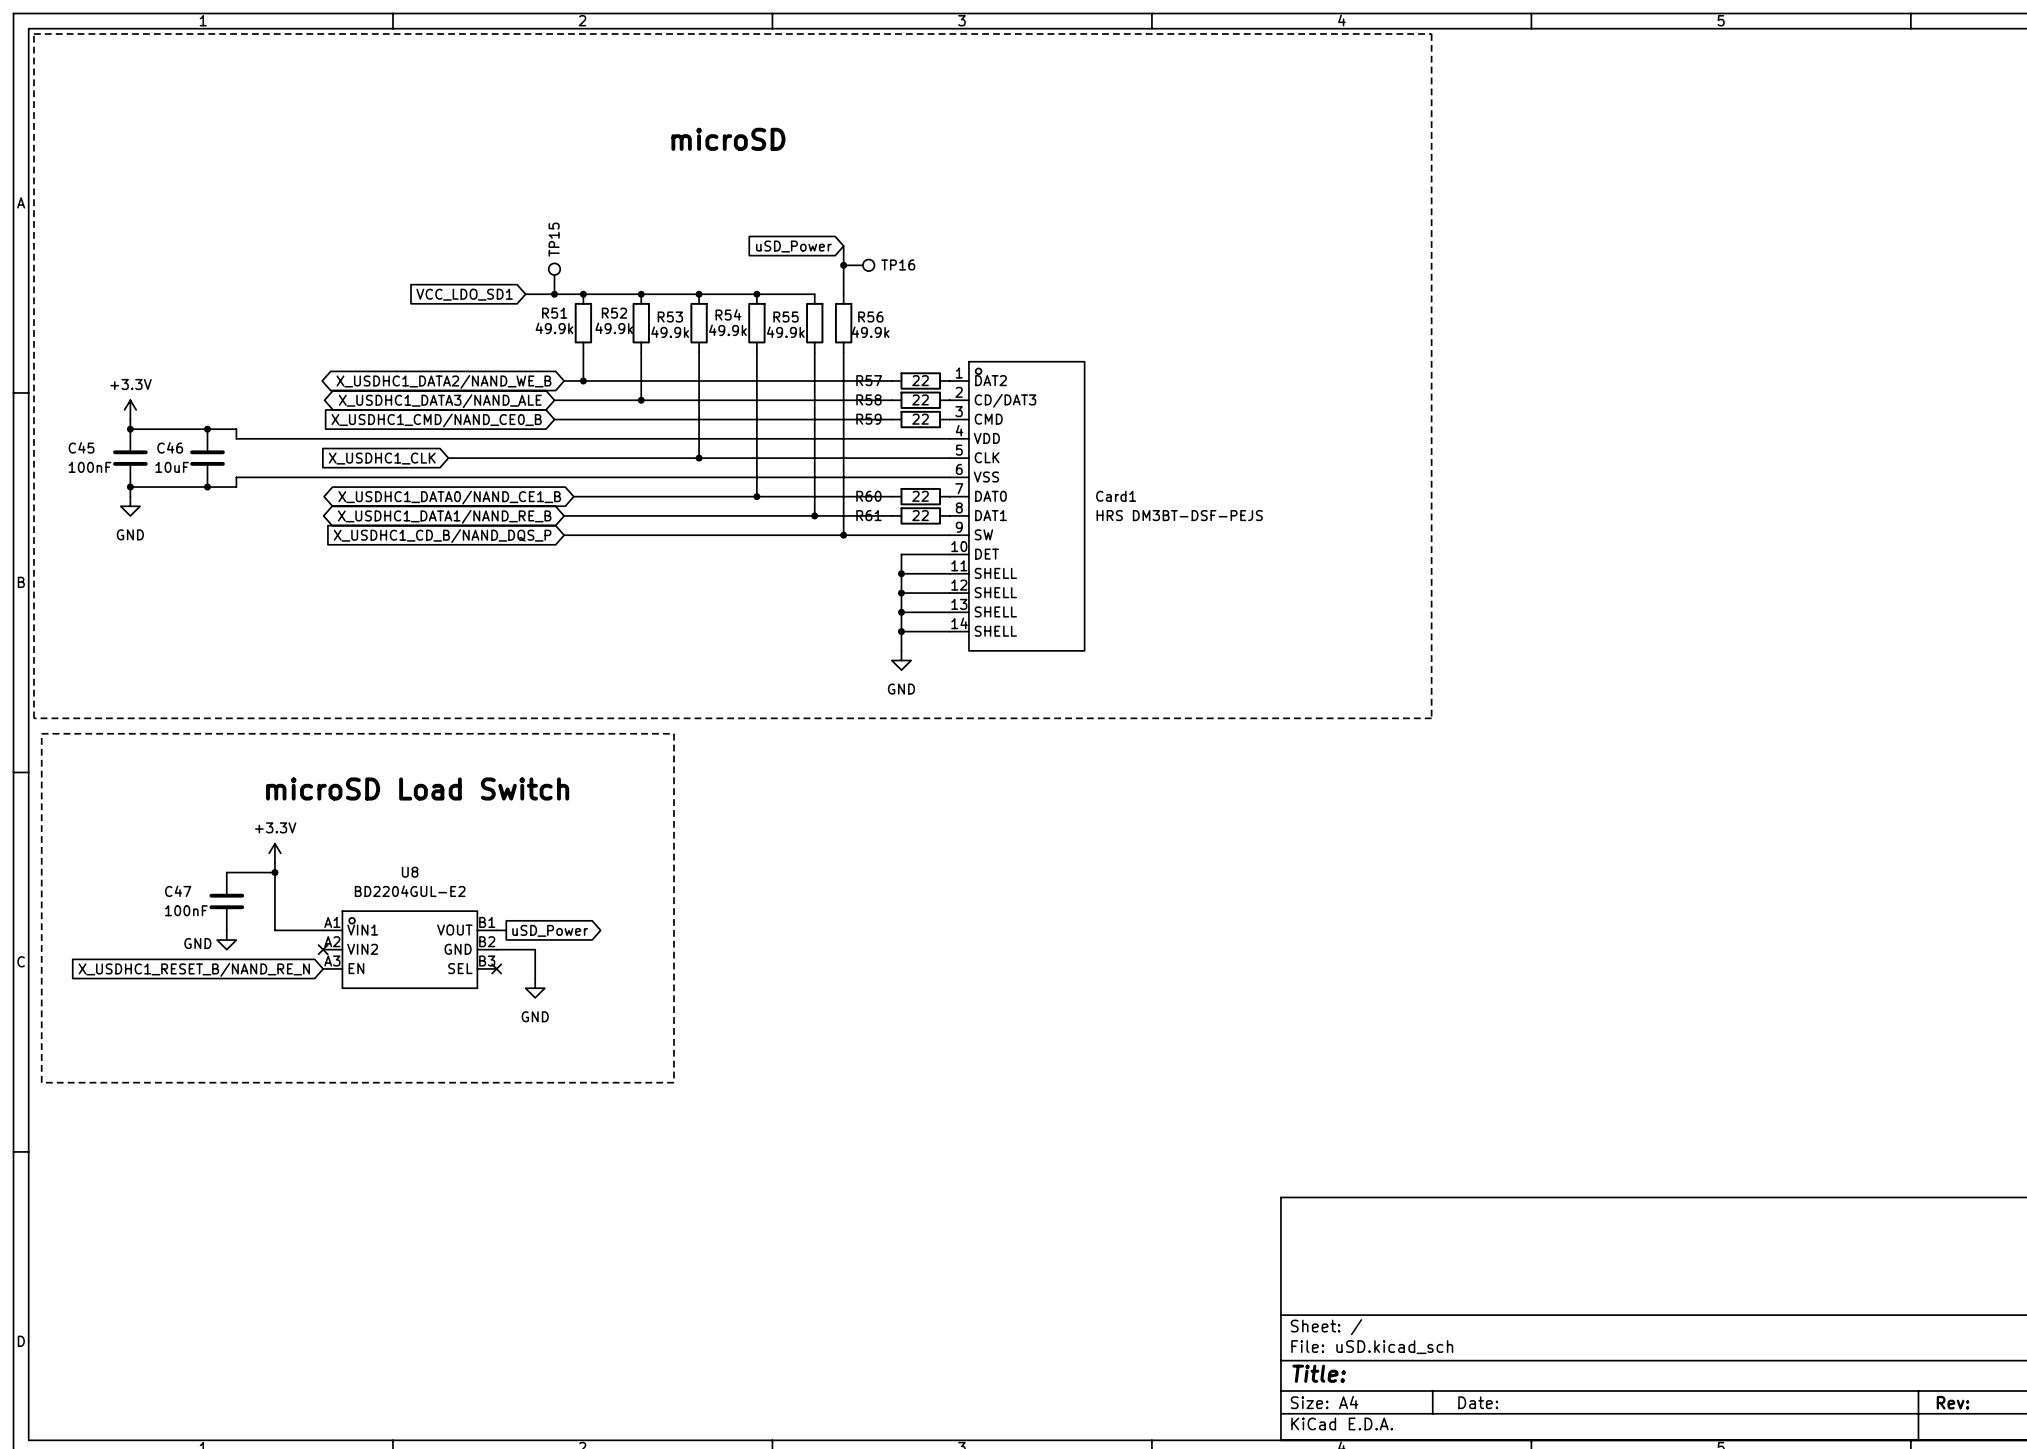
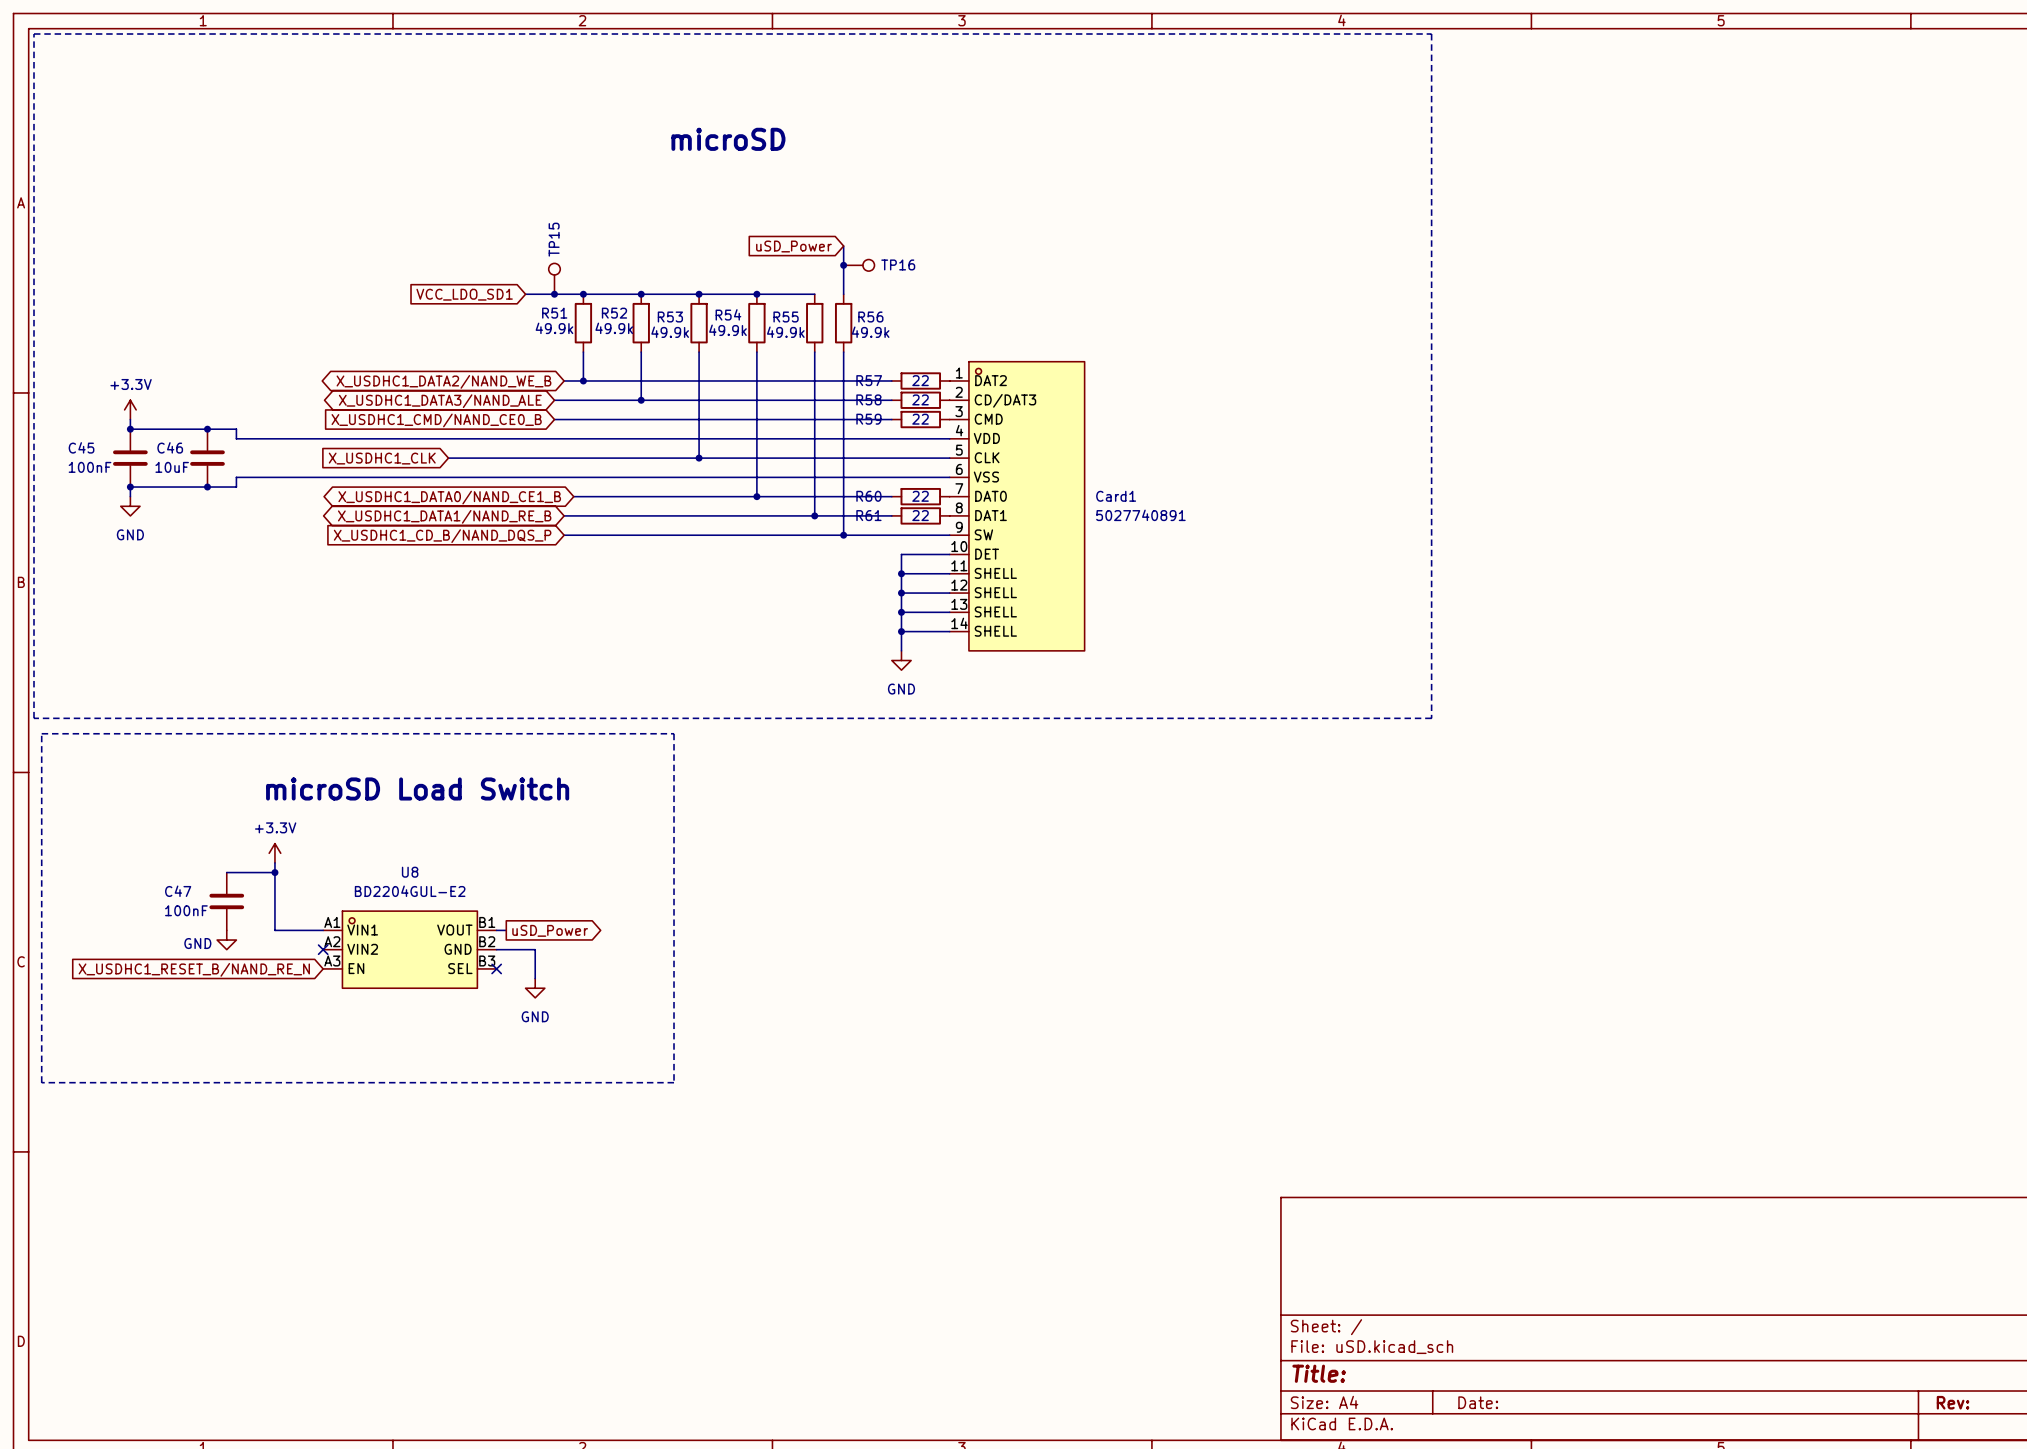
Card1 value: HRS DM3BT-DSF-PEJS (1179, 515) -> 5027740891 (1140, 515)

